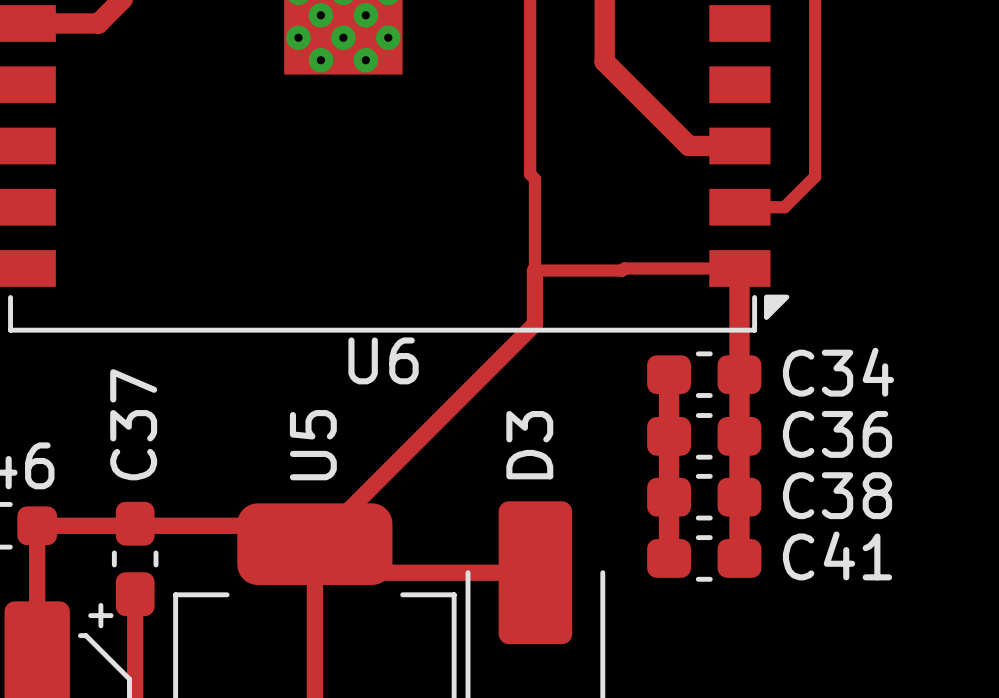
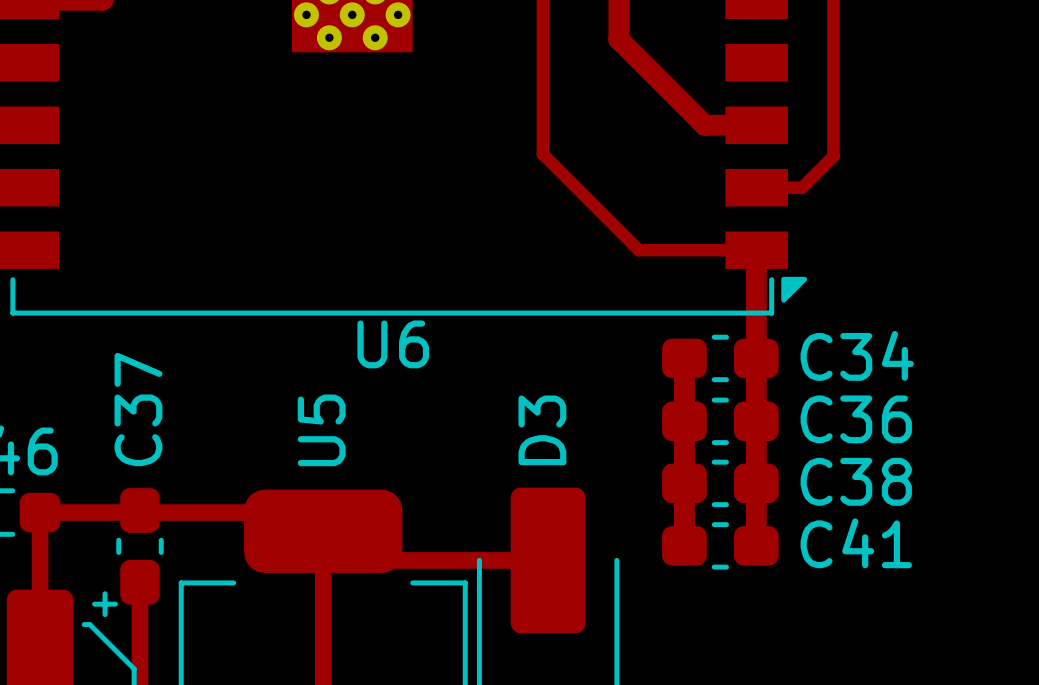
track: (534, 179) (534, 270) -> (547, 158) (638, 250)
track: (624, 268) (622, 270) (534, 270) -> none
track: (534, 270) (534, 324) (314, 544) -> none

